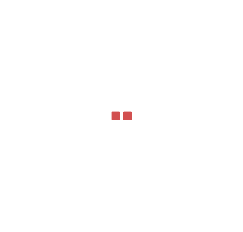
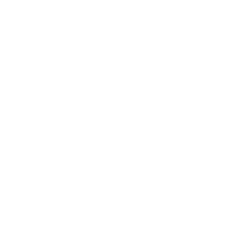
part: (121, 115) -> none

